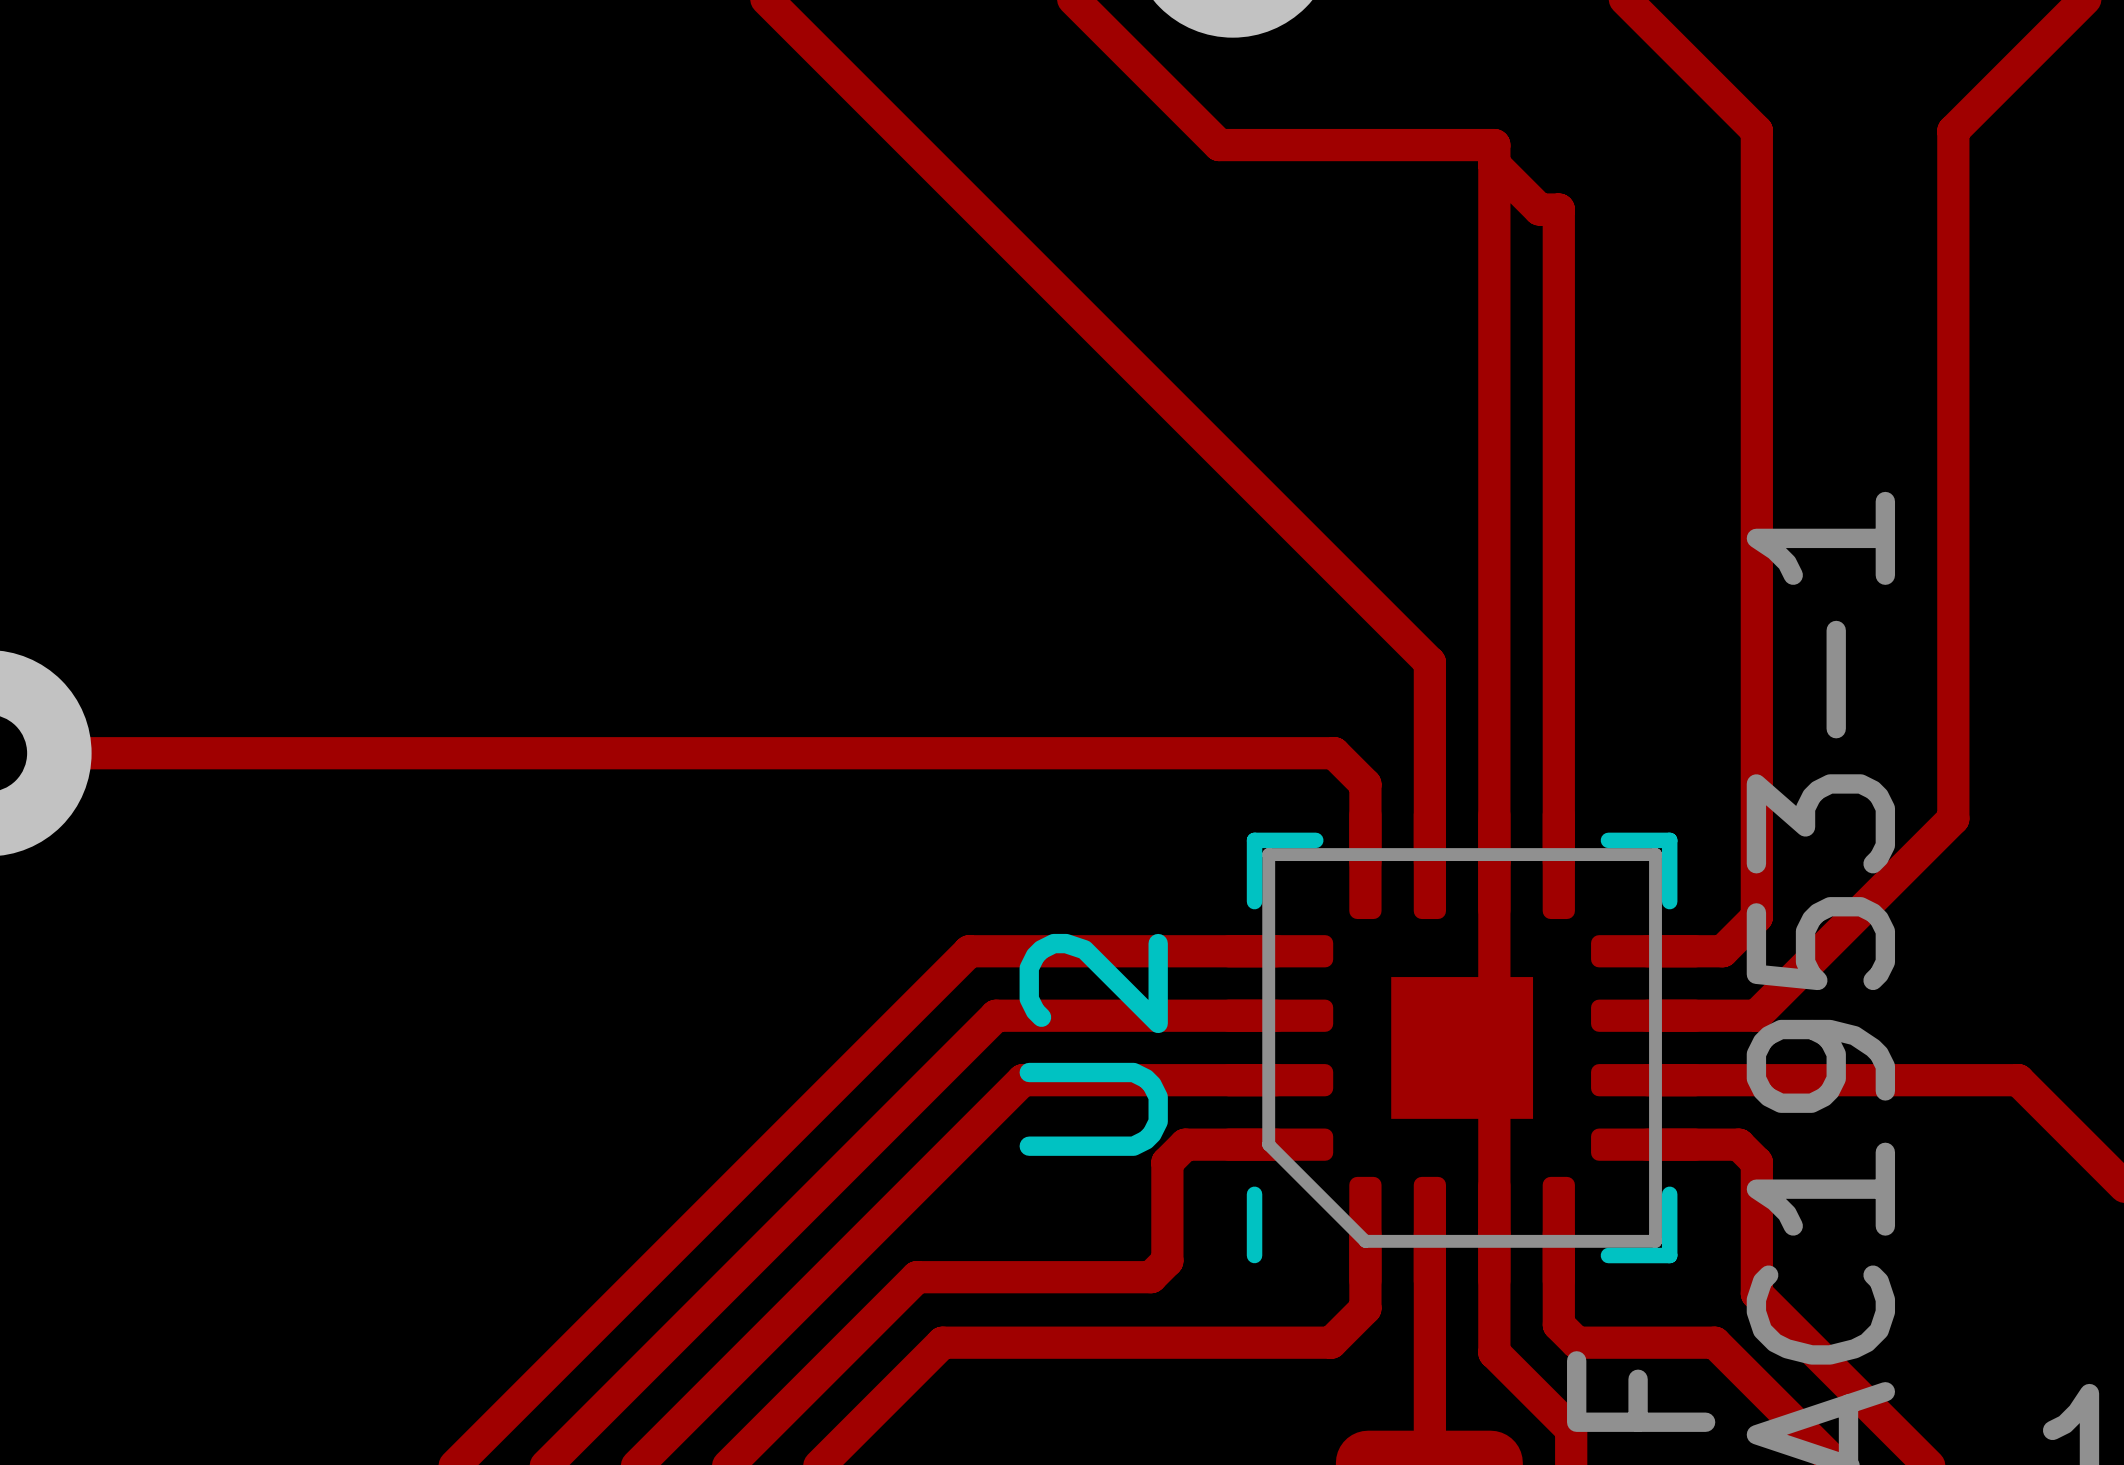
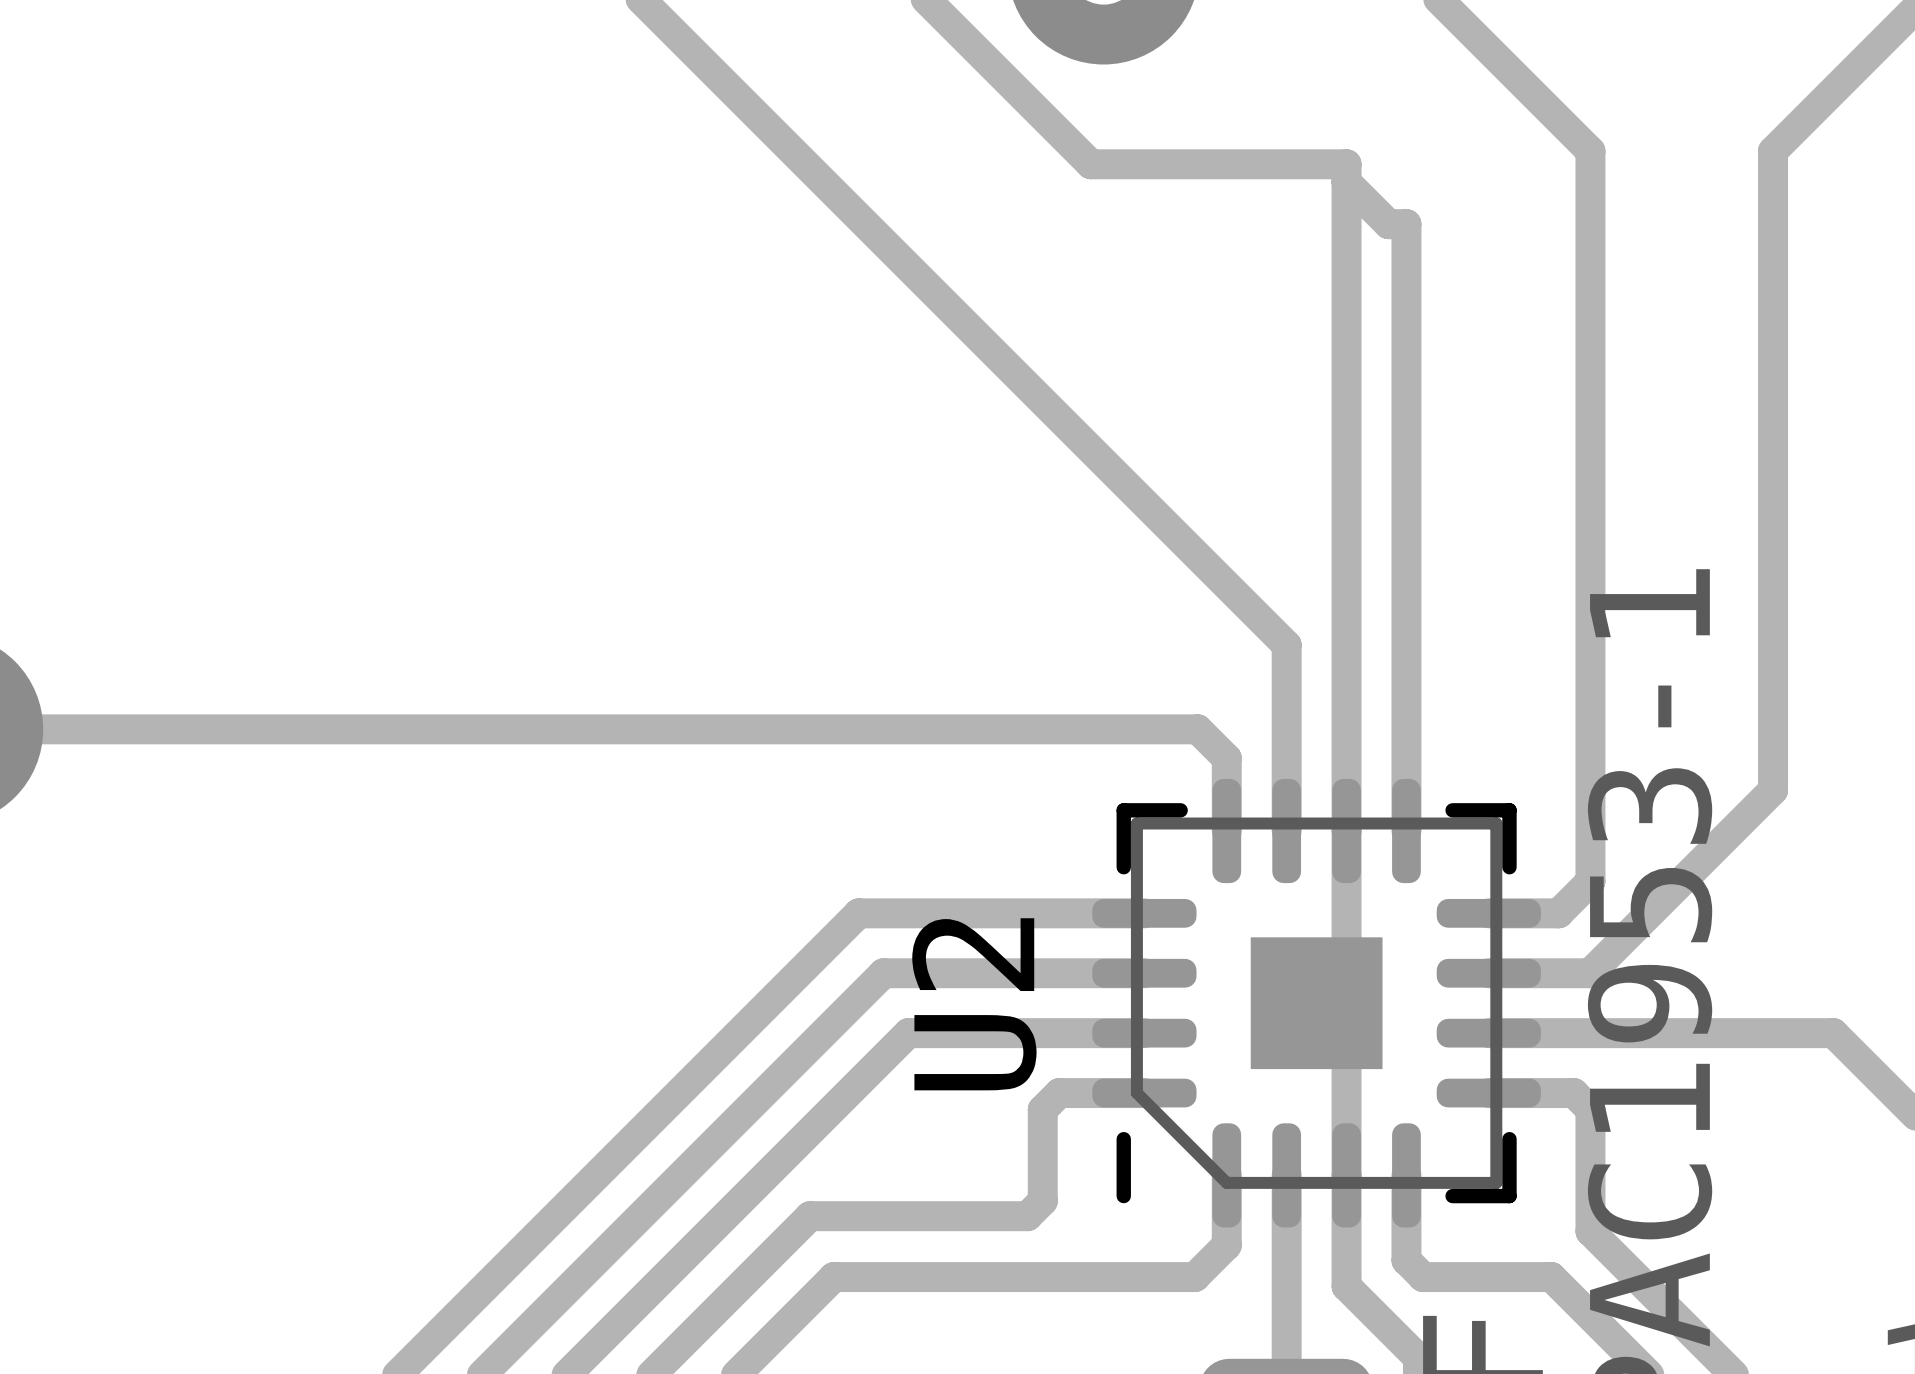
U2 footprint: [1220, 806, 1704, 1290] -> [1092, 778, 1541, 1228]

